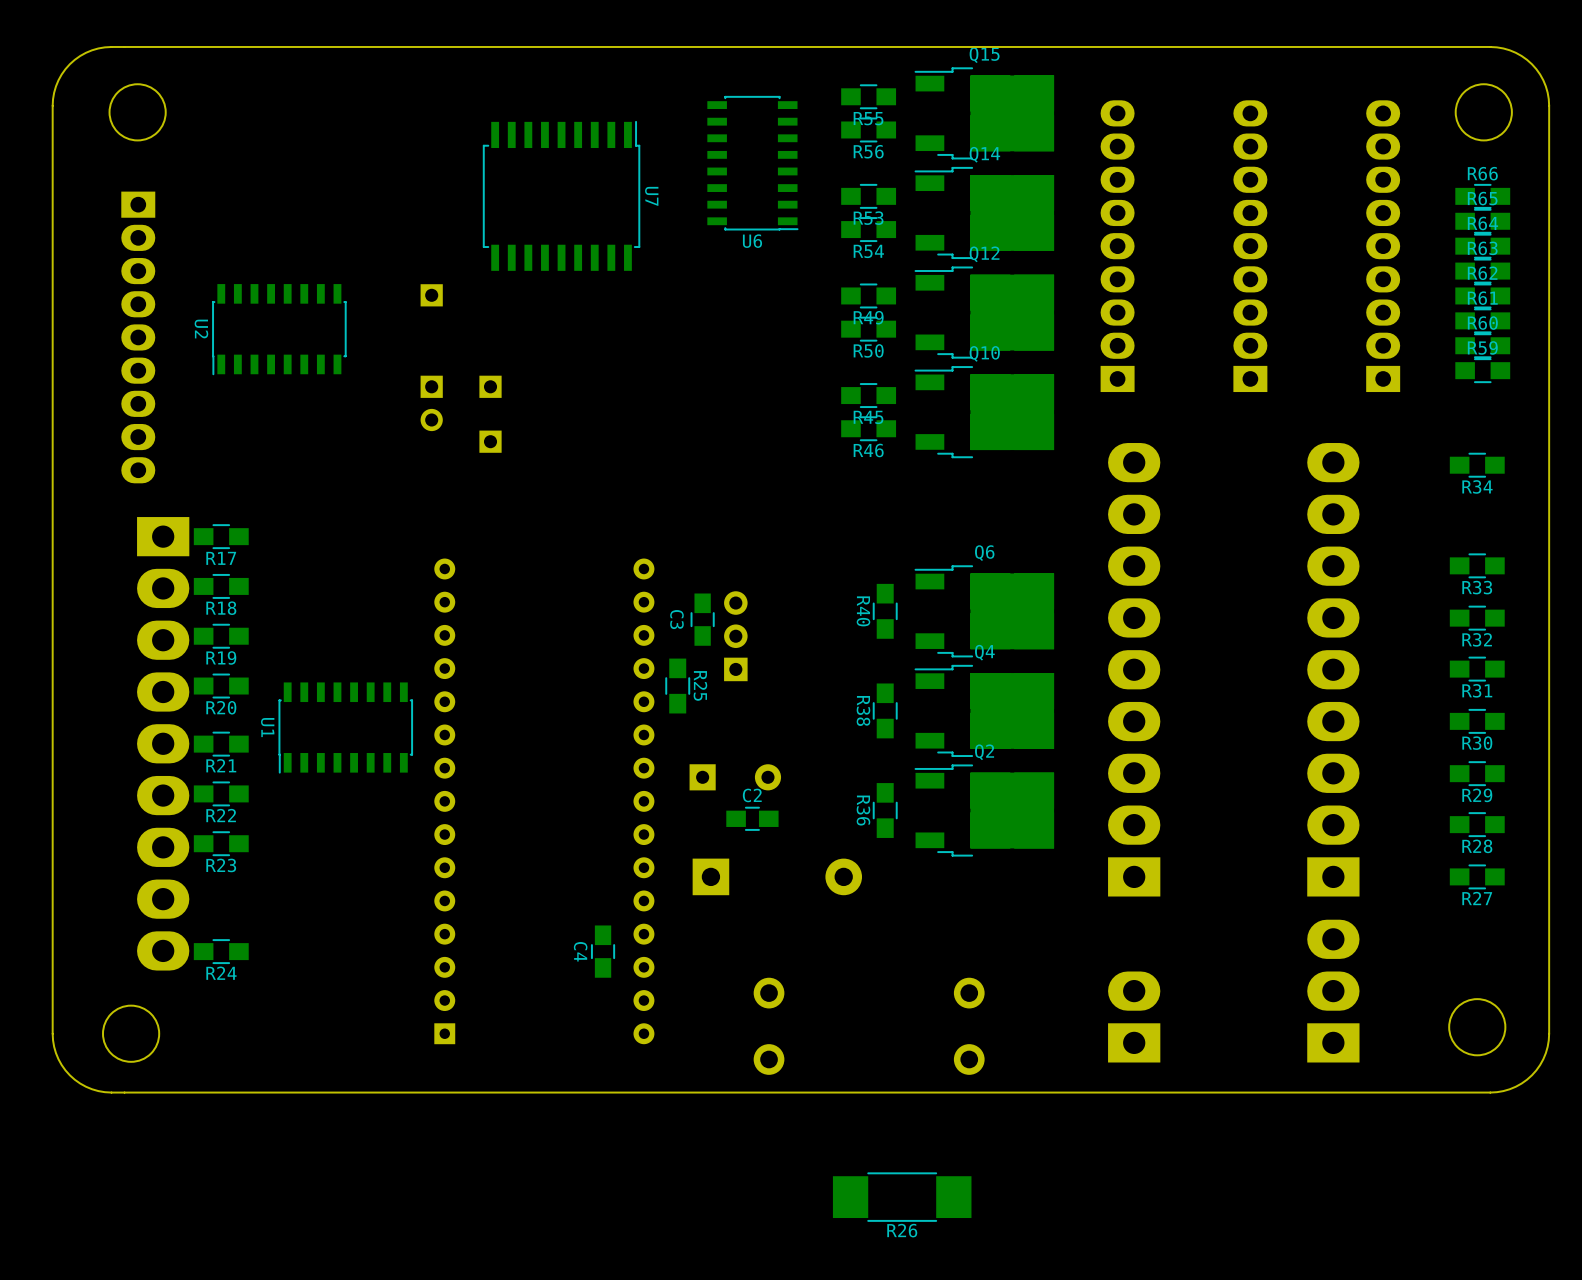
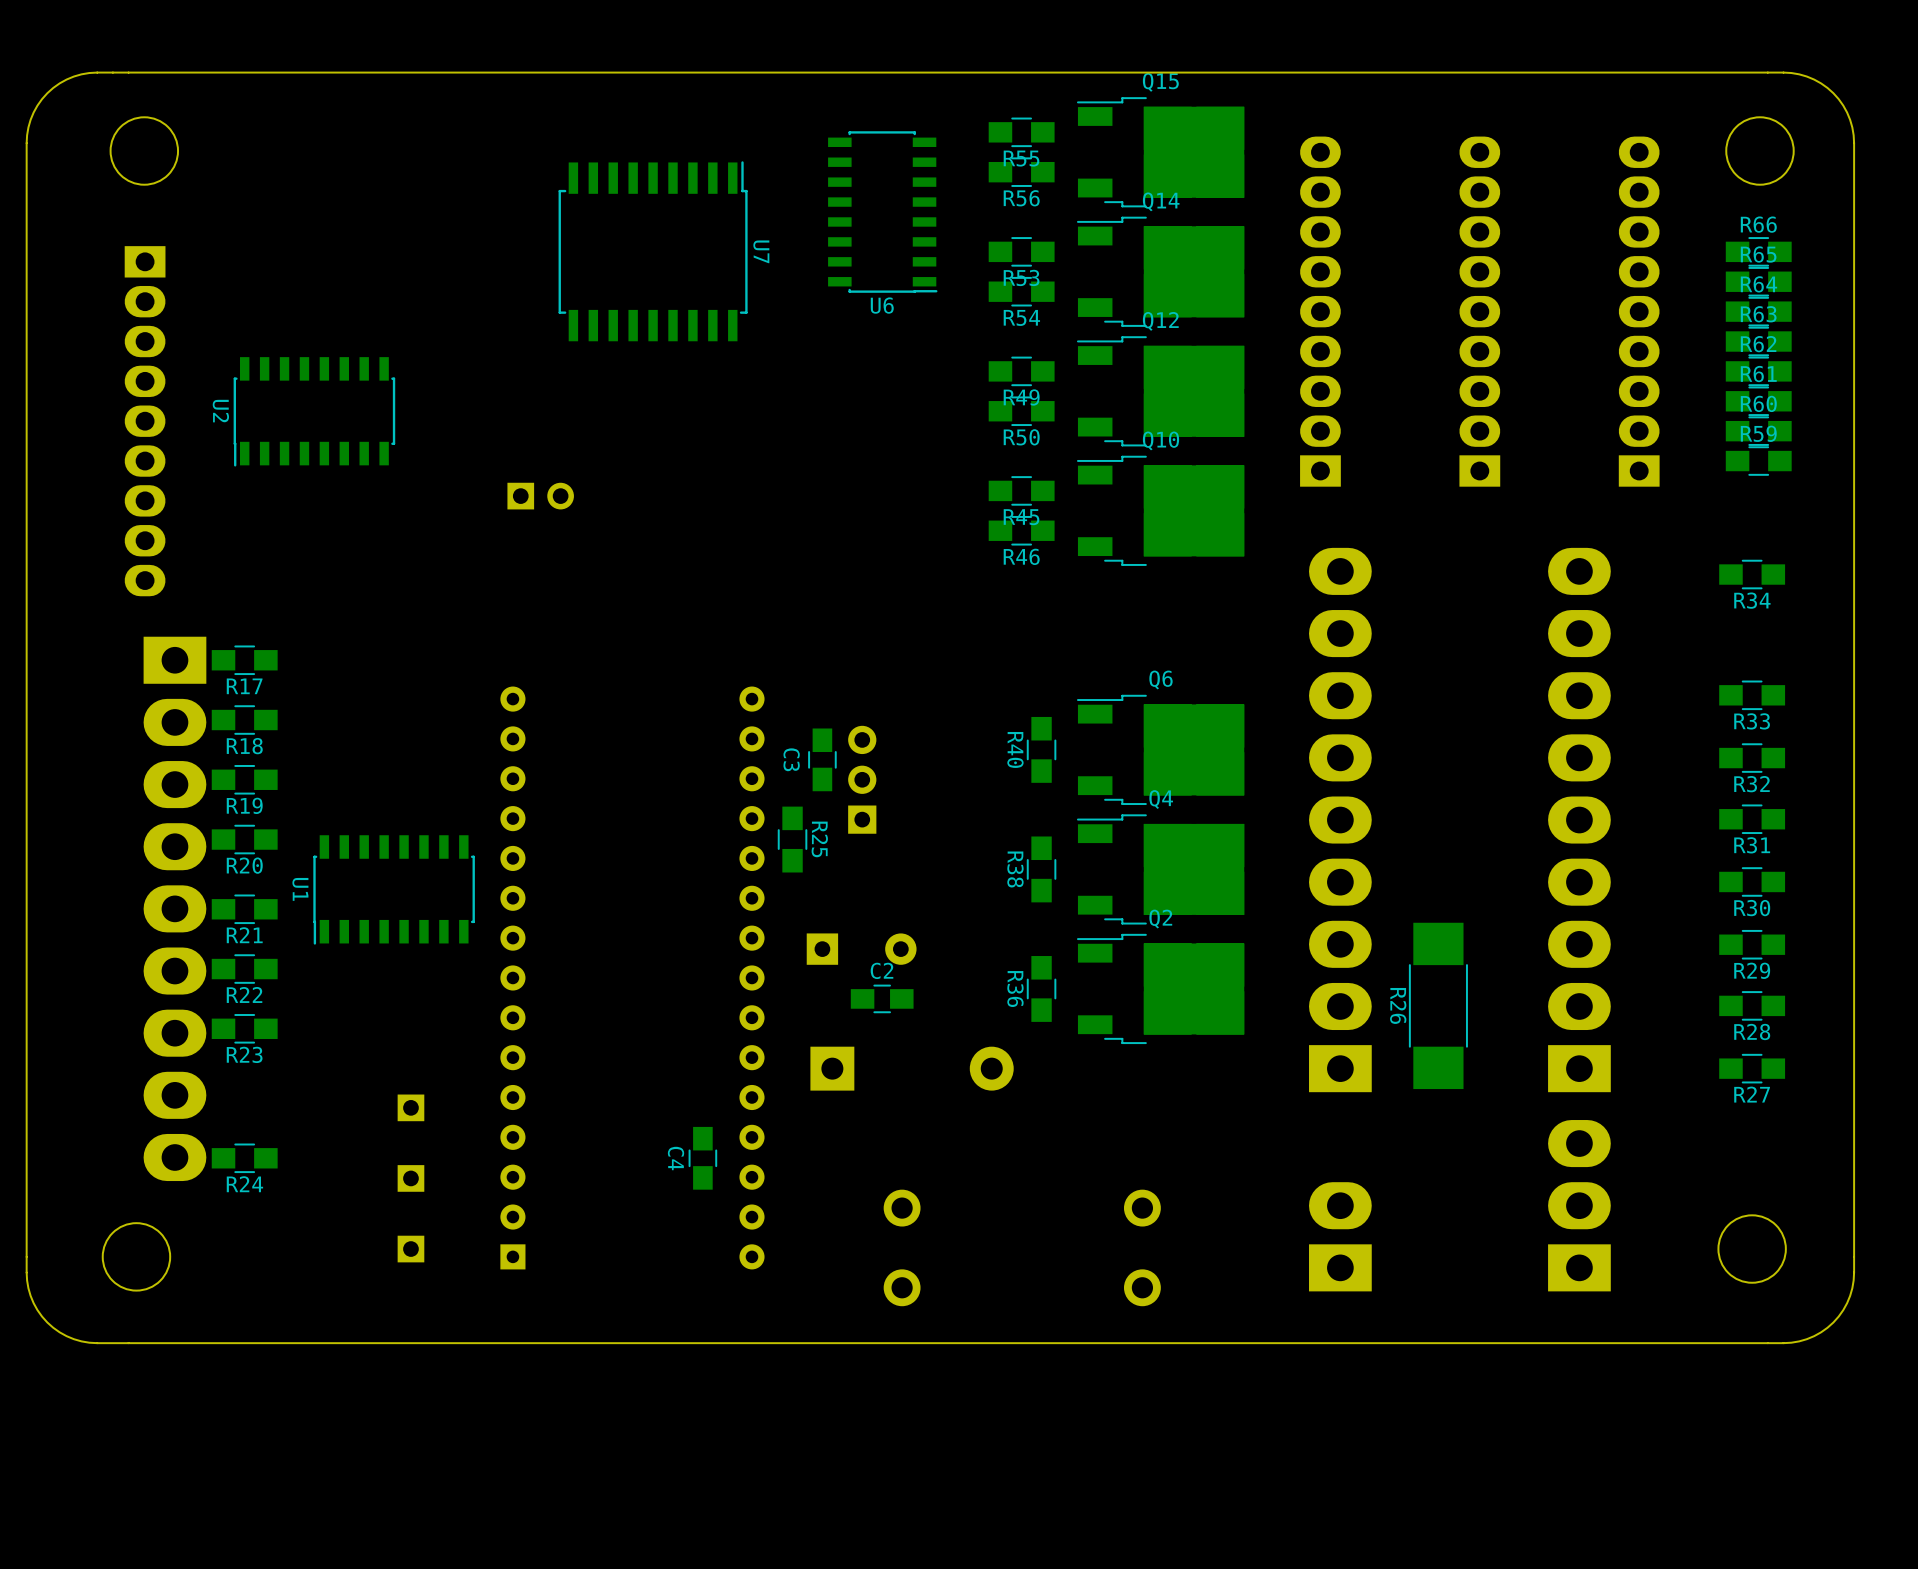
board edge: (1490, 46) (1515, 52) (1531, 64) (1543, 80) (1549, 105) (1548, 1040) (1543, 1059) (1531, 1075) (1509, 1089) (1490, 1092) (111, 1092) (92, 1089) (74, 1079) (58, 1059) (52, 1033) (52, 105) (55, 86) (69, 64) (85, 52) (111, 46) -> (1767, 72) (1799, 74) (1814, 79) (1827, 87) (1838, 99) (1847, 112) (1852, 127) (1854, 143) (1853, 1280) (1847, 1303) (1833, 1322) (1821, 1332) (1806, 1339) (1783, 1343) (97, 1343) (73, 1339) (53, 1327) (42, 1316) (33, 1303) (28, 1288) (26, 1272) (26, 143) (28, 127) (33, 112) (42, 99) (53, 87) (66, 79) (81, 74) (112, 72)
part: (431, 295) -> none
part: (490, 386) -> none
part rotation: 0° (431, 403) -> 90° counterclockwise (540, 496)
part position: (431, 403) -> (540, 496)
part: (490, 441) -> none
part: none -> (410, 1107)
part: none -> (410, 1178)
part: none -> (410, 1249)
R26 rotation: 0° (902, 1197) -> 90° clockwise (1438, 1005)
R26 position: (902, 1197) -> (1438, 1005)

